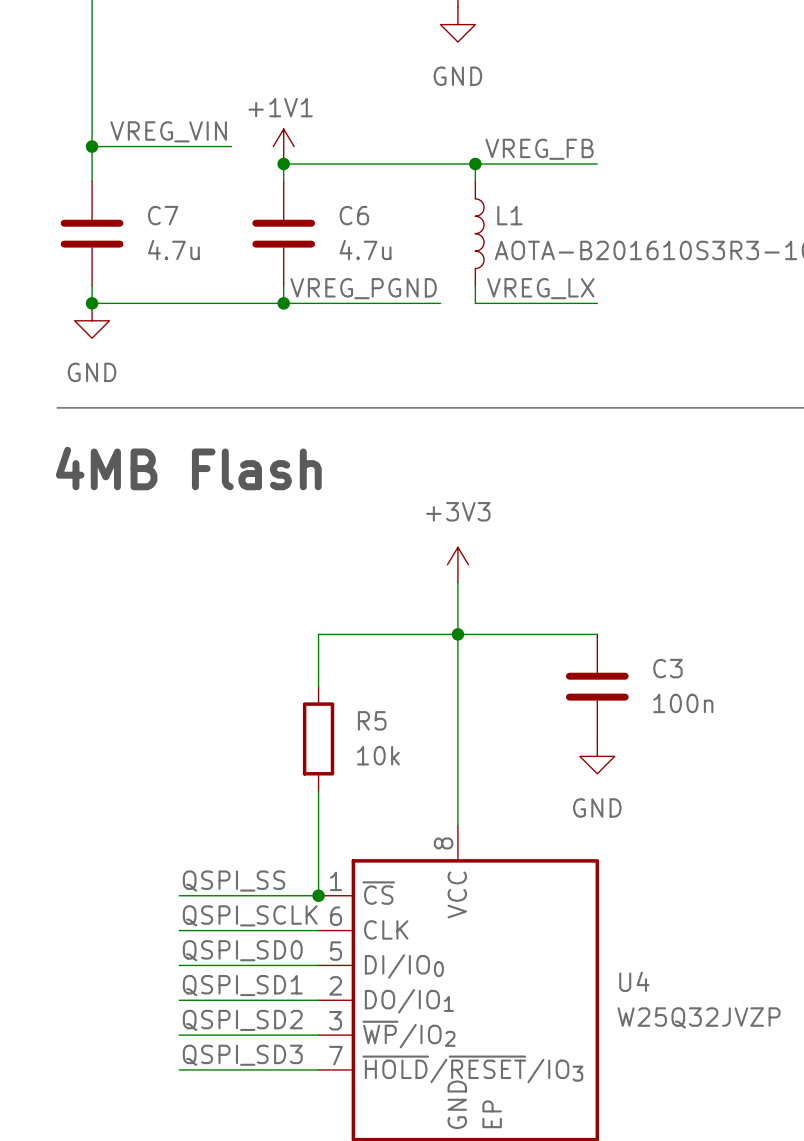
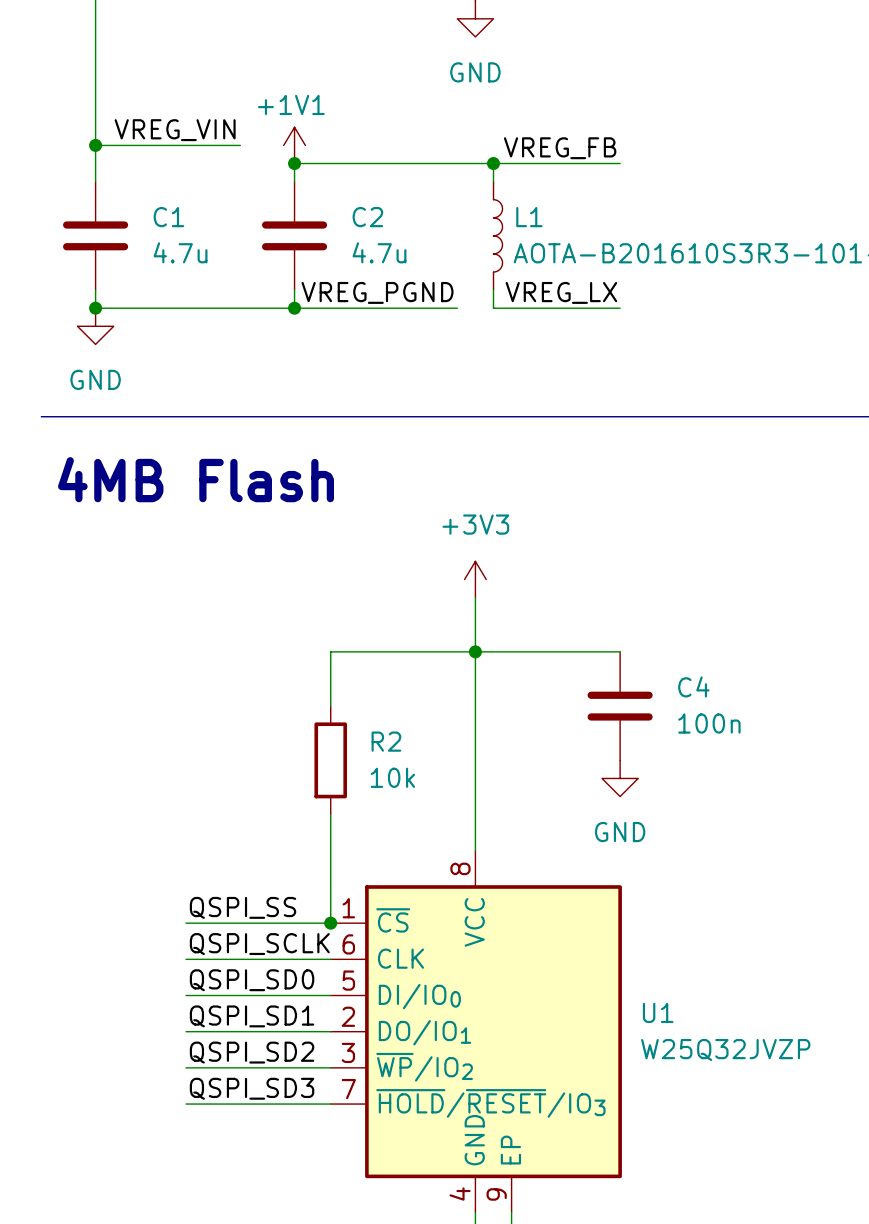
C7 name: C7 (163, 215) -> C1 (168, 217)
C6 name: C6 (354, 215) -> C2 (367, 217)
line: none -> (41, 416) (59, 416)
C3 name: C3 (667, 668) -> C4 (693, 686)
R5 name: R5 (372, 720) -> R2 (386, 741)
U4 name: U4 (634, 981) -> U1 (658, 1012)

